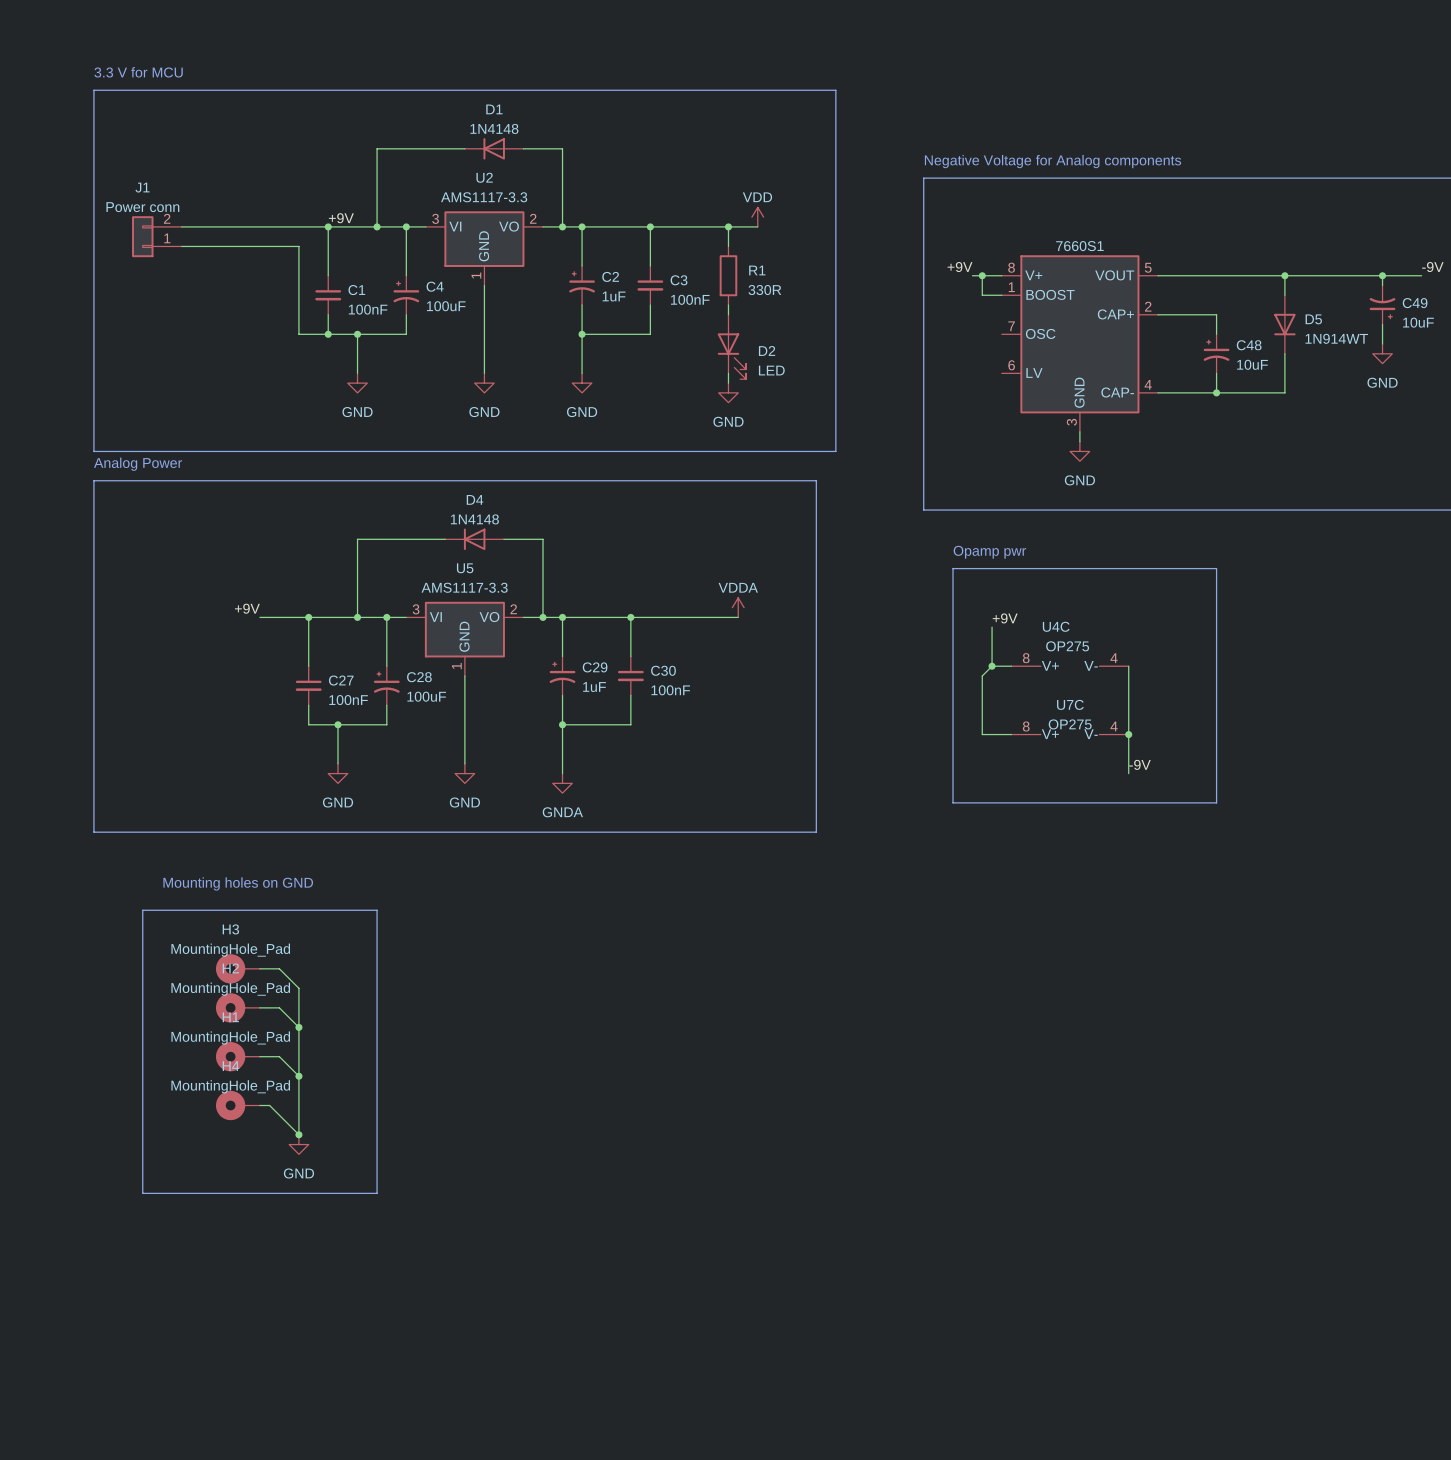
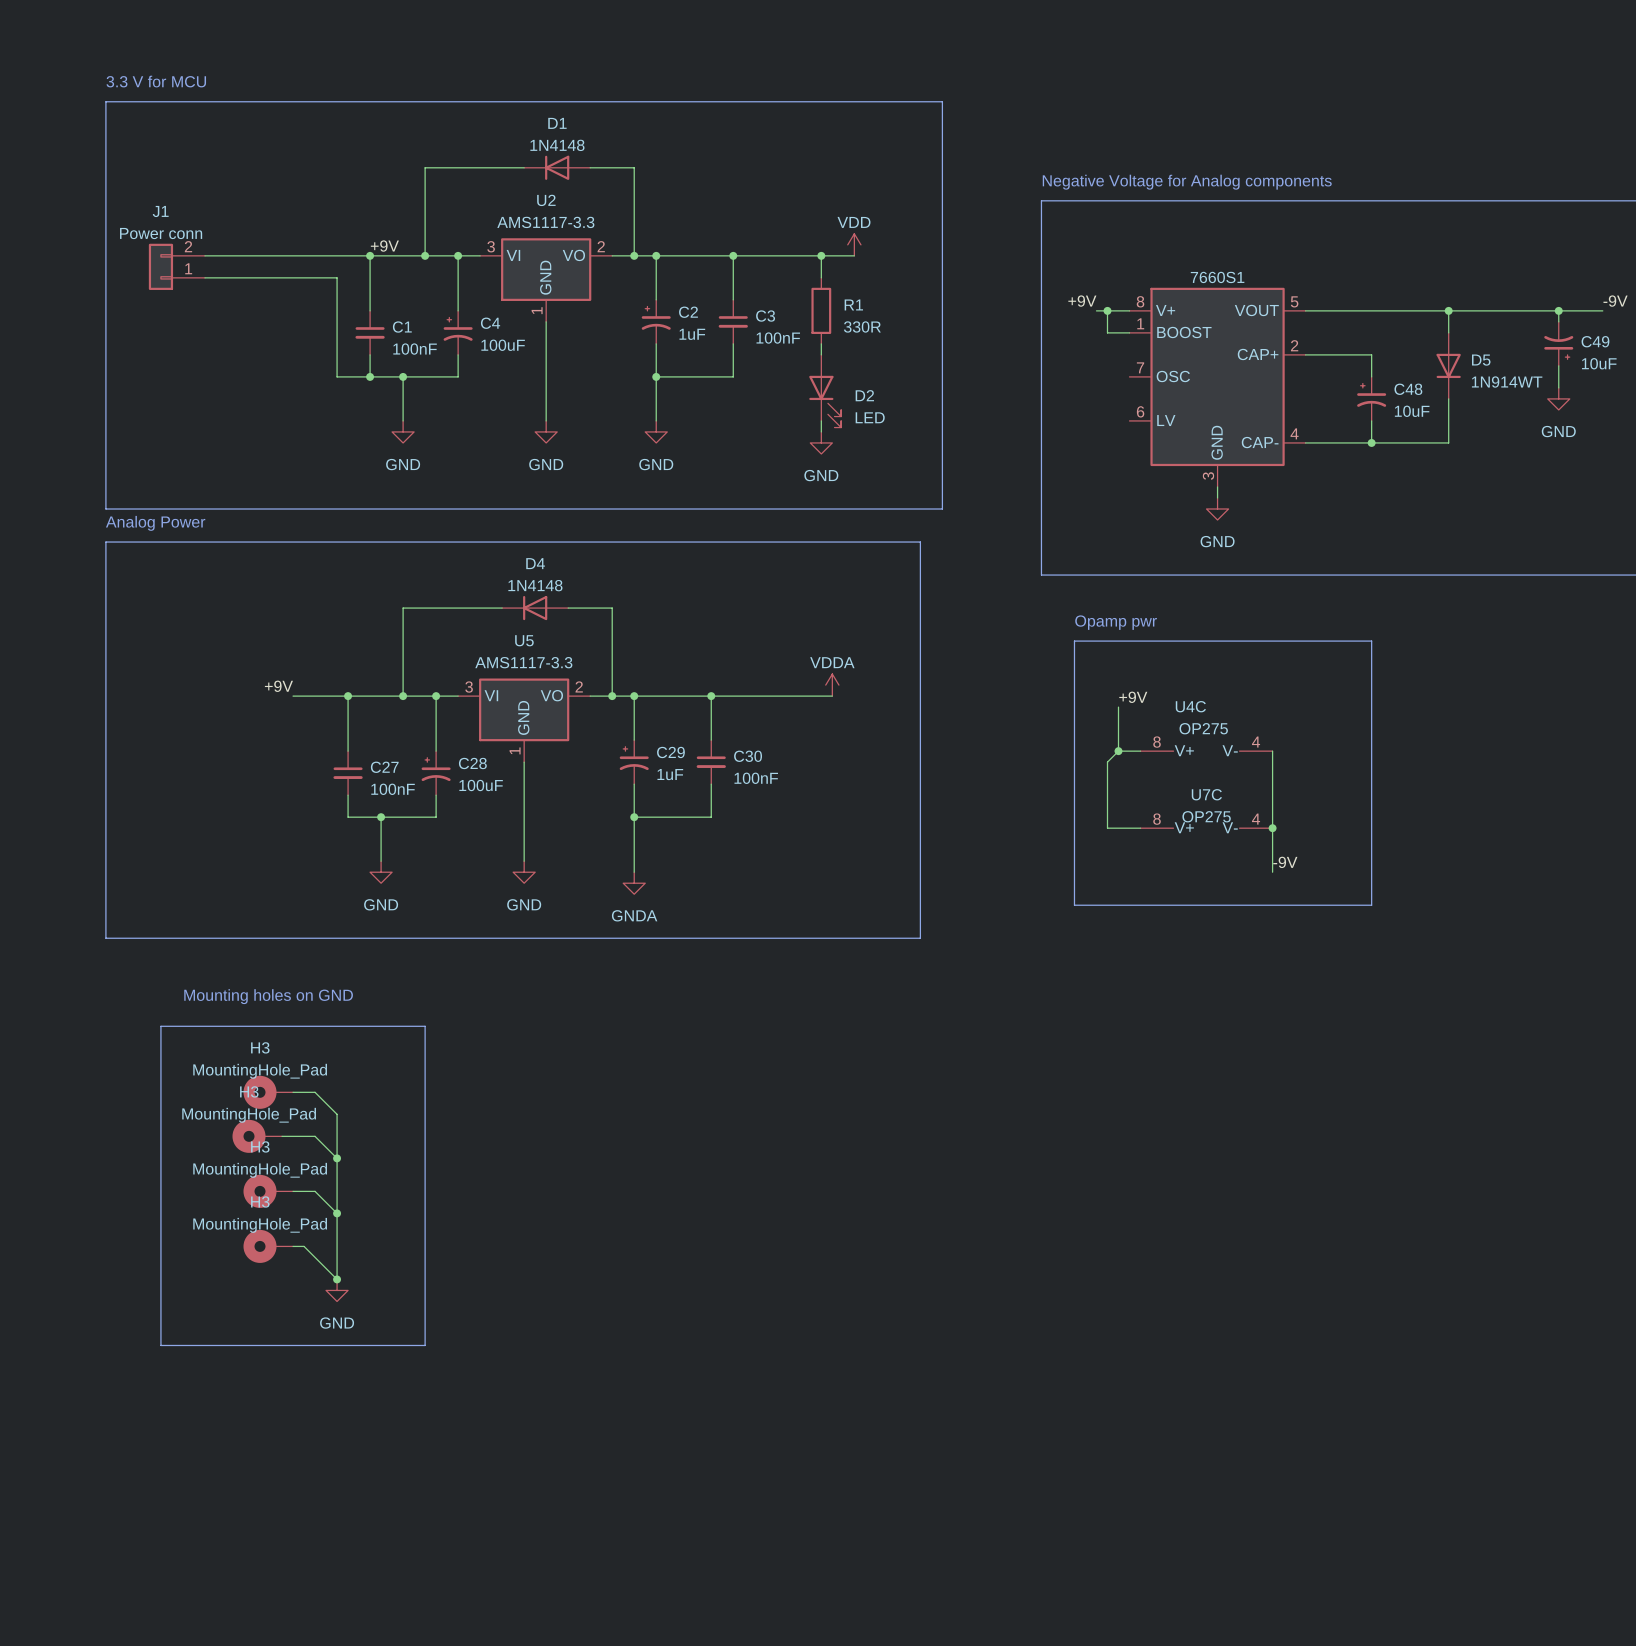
H3: none -> MountingHole_Pad (257, 1136)
H2: MountingHole_Pad (237, 1007) -> none
H1 name: H1 (230, 1017) -> H3 (260, 1146)
H4 name: H4 (230, 1066) -> H3 (260, 1201)

